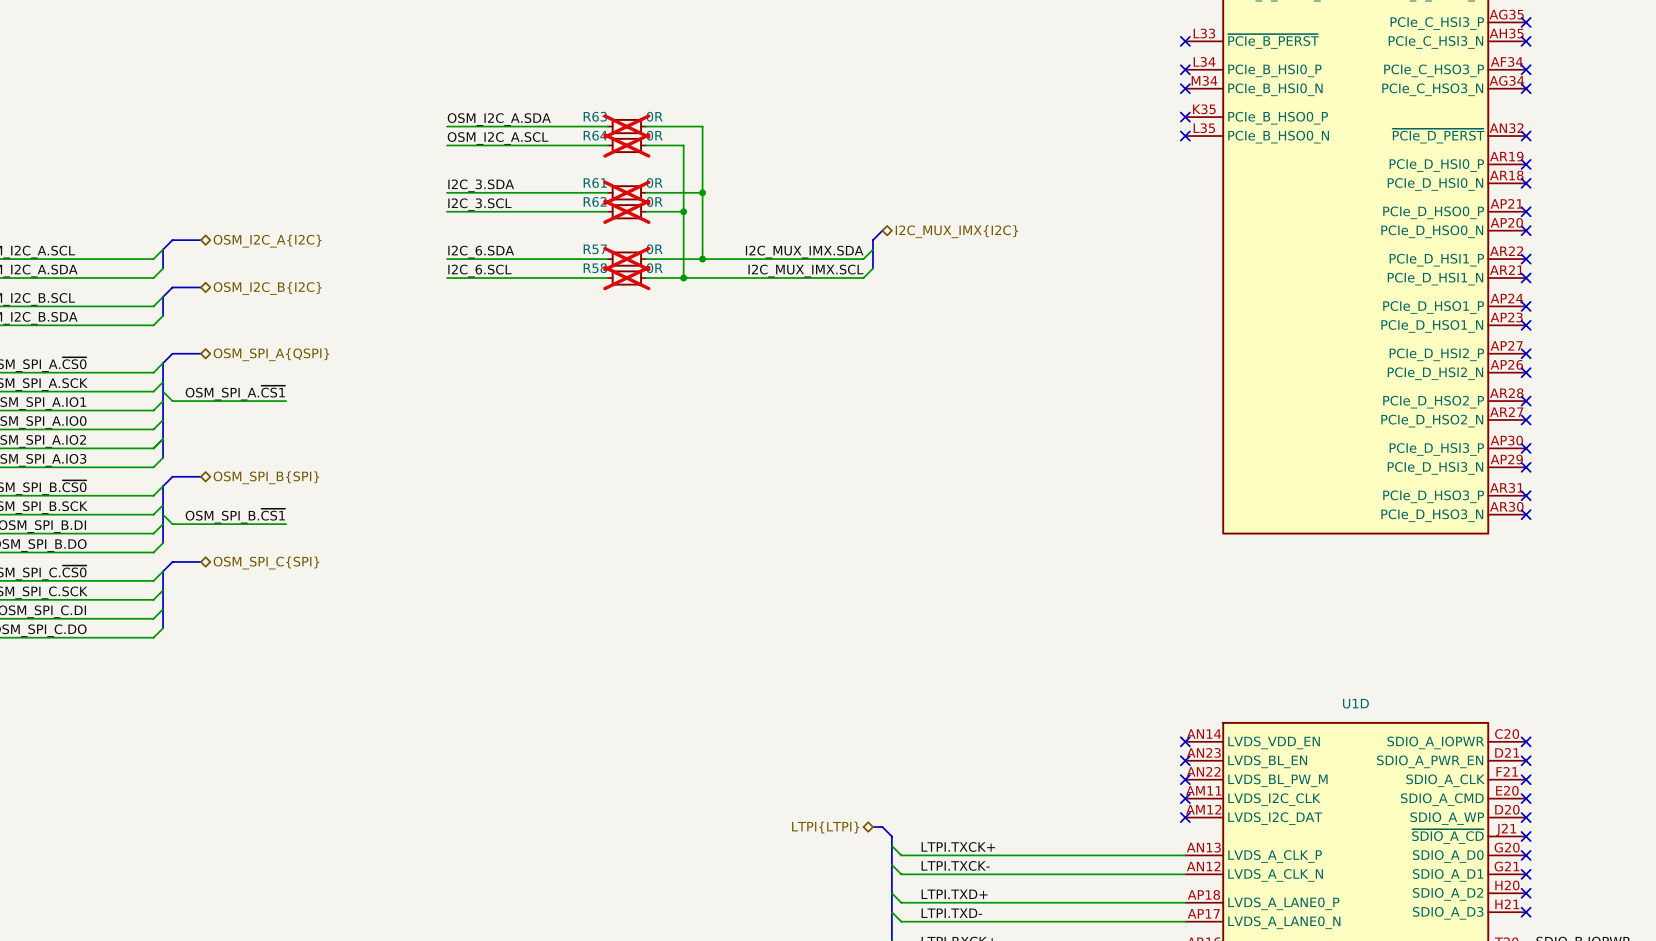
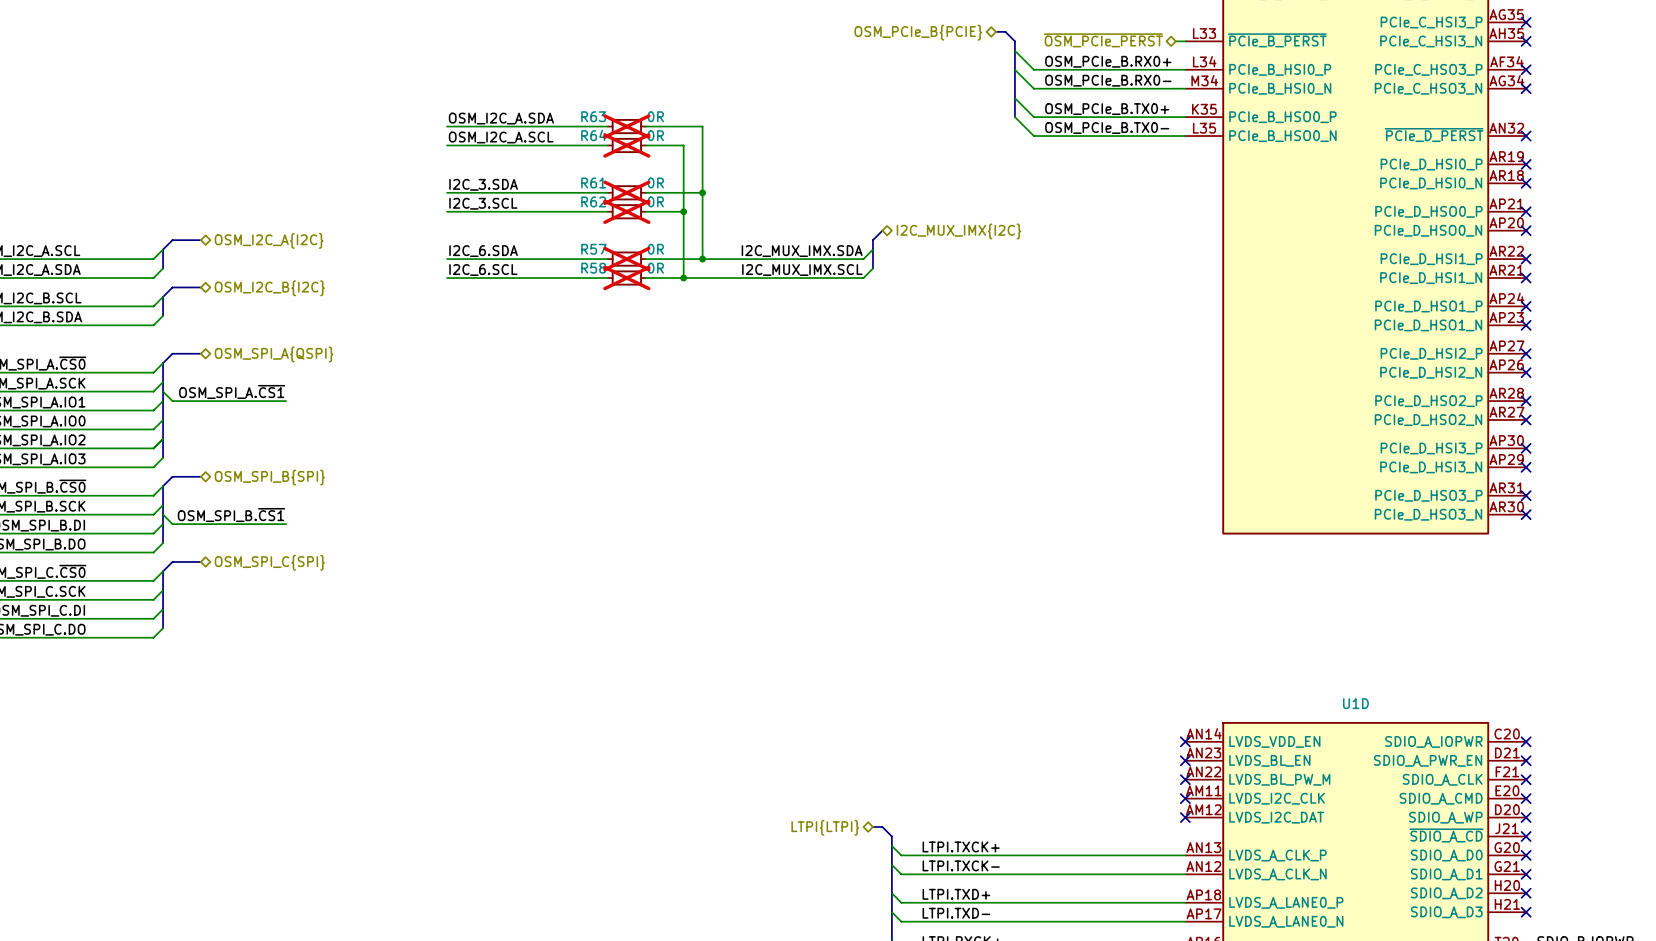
bus: none -> (996, 31) (1005, 31) (1014, 41) (1014, 117)
hierarchical label: none -> OSM_PCIe_B{PCIE} (918, 32)
hierarchical label: none -> ~{OSM_PCIe_PERST} (1103, 40)
wire: none -> (1175, 41) (1185, 41)
no-connect mark: (1185, 41) -> none
wire: none -> (1014, 50) (1033, 69) (1185, 69)
label: none -> OSM_PCIe_B.RX0+ (1108, 61)
wire: none -> (1014, 69) (1033, 88) (1185, 88)
no-connect mark: (1185, 69) -> none
label: none -> OSM_PCIe_B.RX0- (1108, 80)
no-connect mark: (1185, 88) -> none
wire: none -> (1014, 98) (1033, 117) (1185, 117)
label: none -> OSM_PCIe_B.TX0+ (1107, 109)
wire: none -> (1014, 117) (1033, 136) (1185, 136)
no-connect mark: (1185, 117) -> none
label: none -> OSM_PCIe_B.TX0- (1107, 128)
no-connect mark: (1185, 136) -> none

